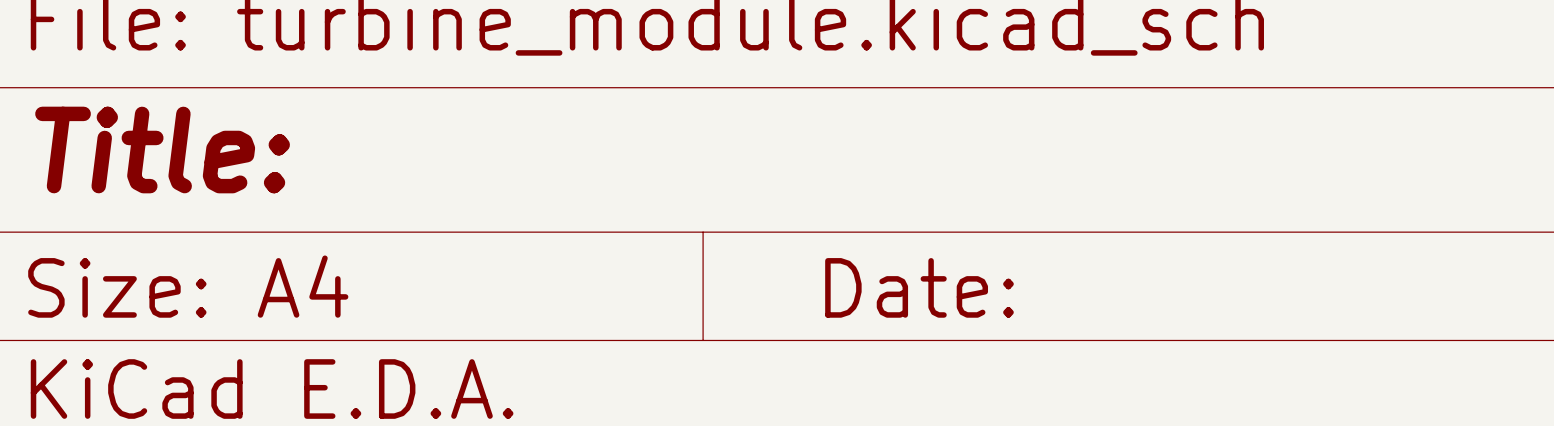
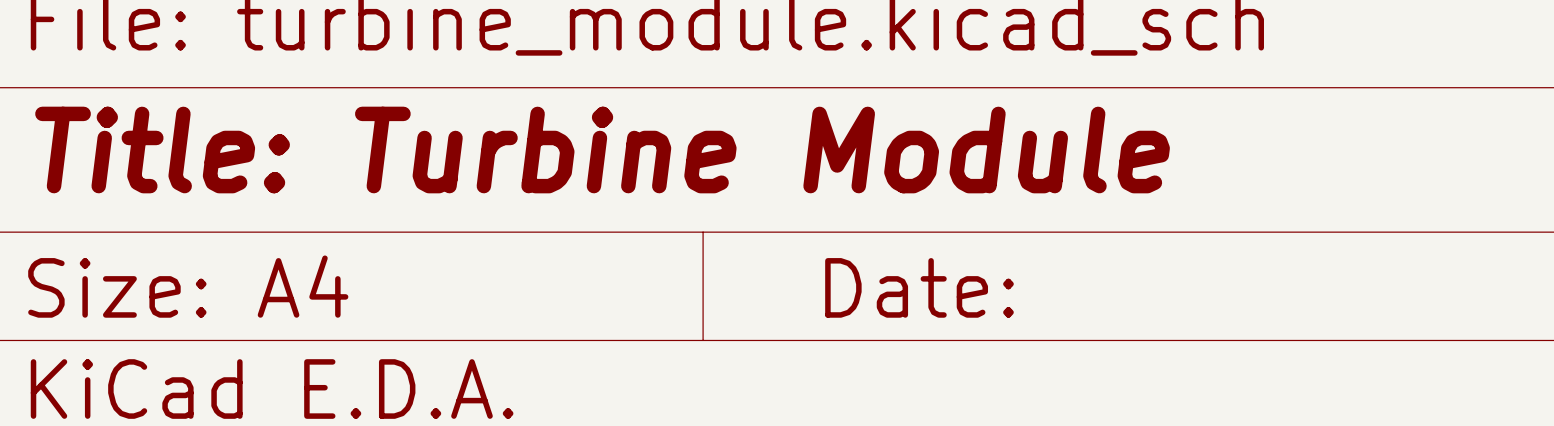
title block: Title: (162, 150) -> Title: Turbine Module (602, 150)

